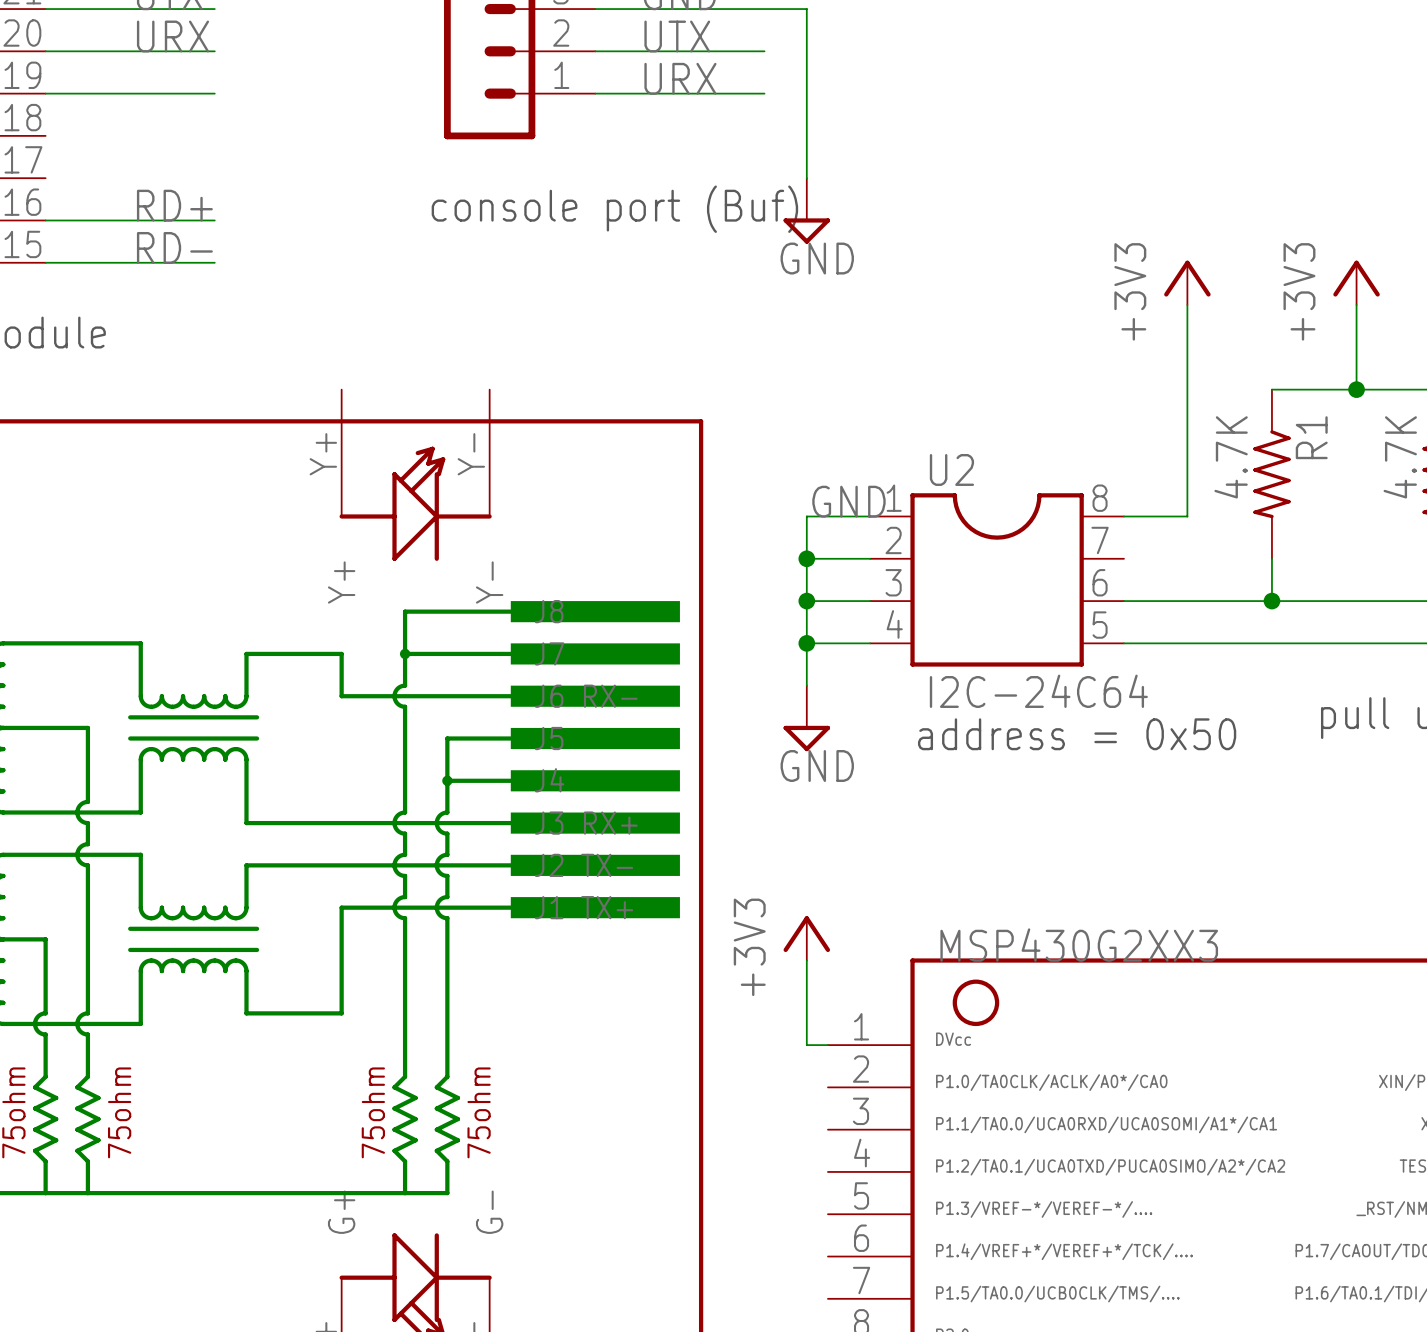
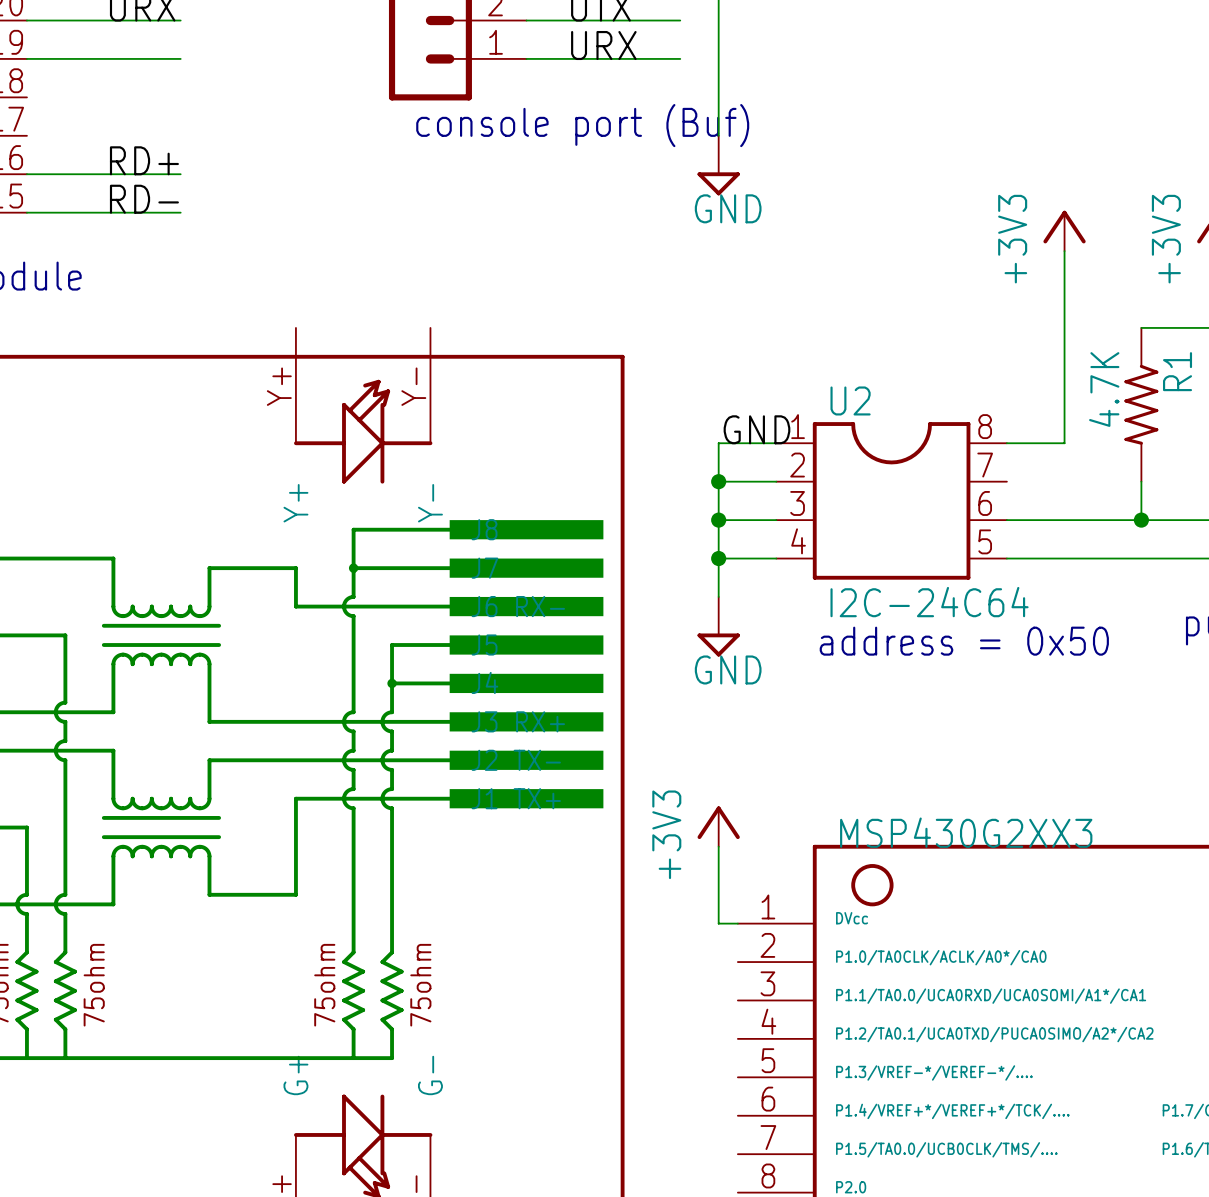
text position: console port (Buf) (614, 209) -> console port (Buf) (582, 125)

